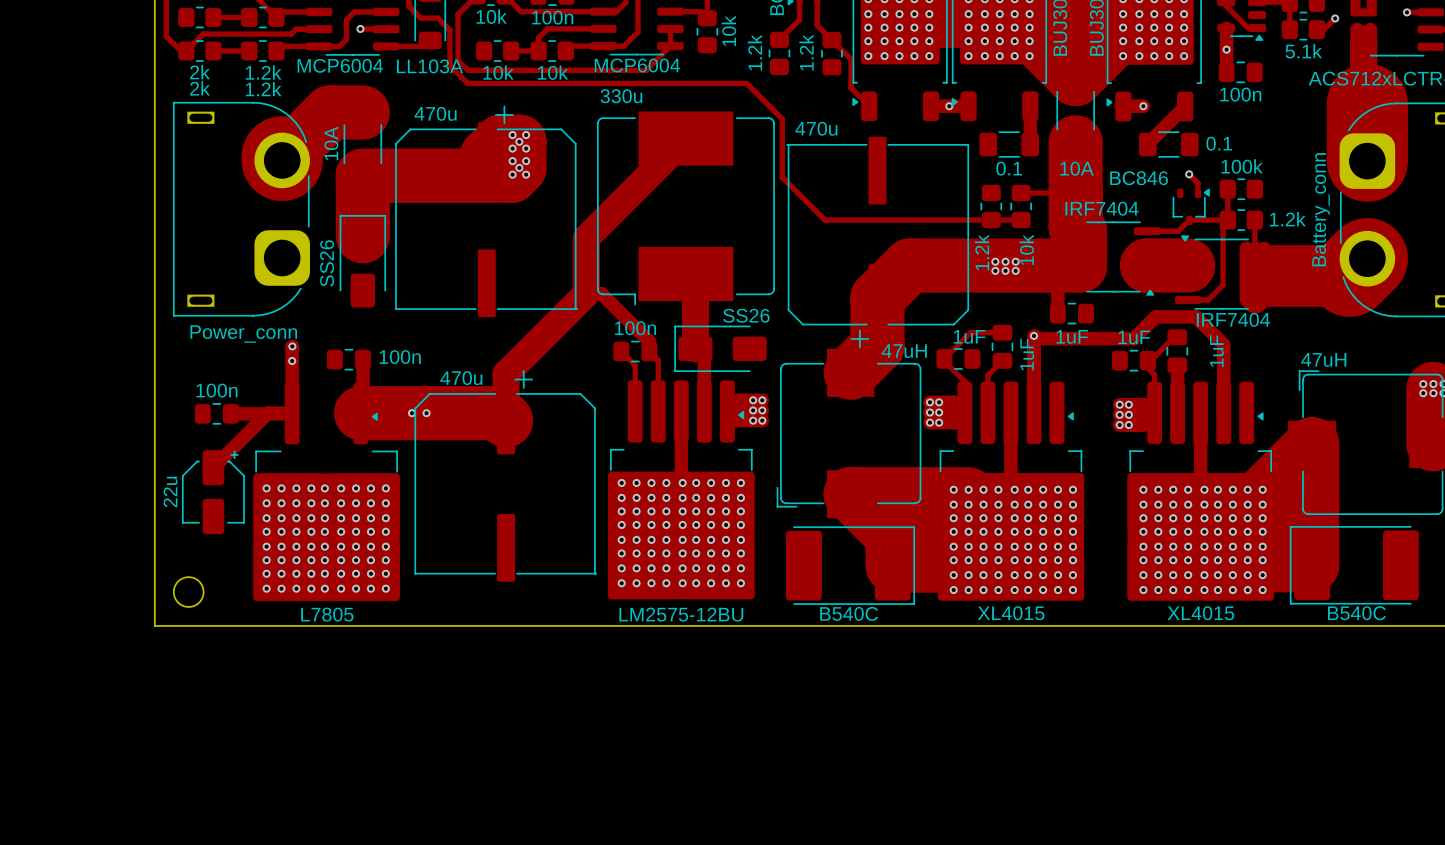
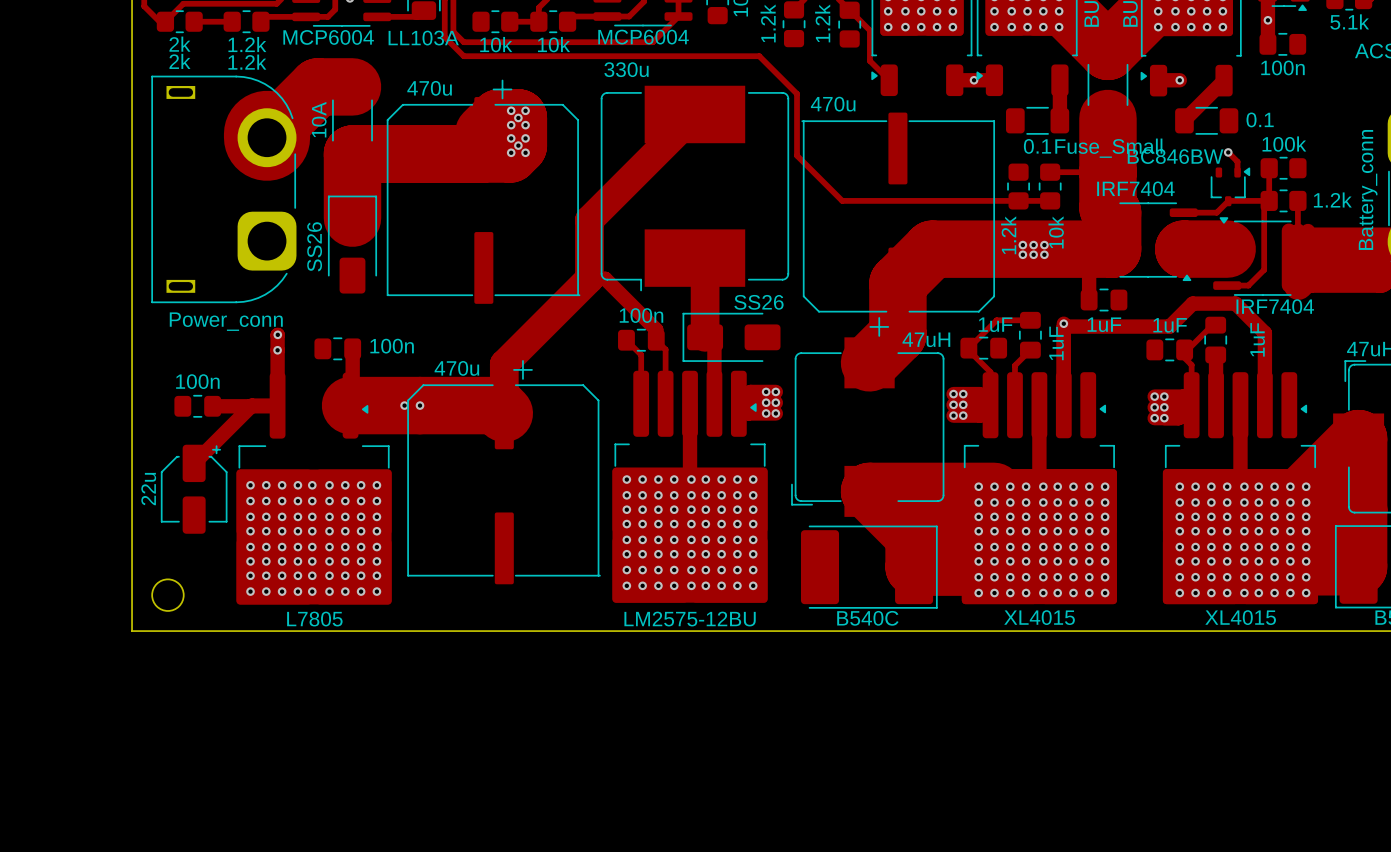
part value: 10A (1077, 168) -> Fuse_Small (1108, 148)
part value: BC846 (1139, 178) -> BC846BW (1175, 156)

